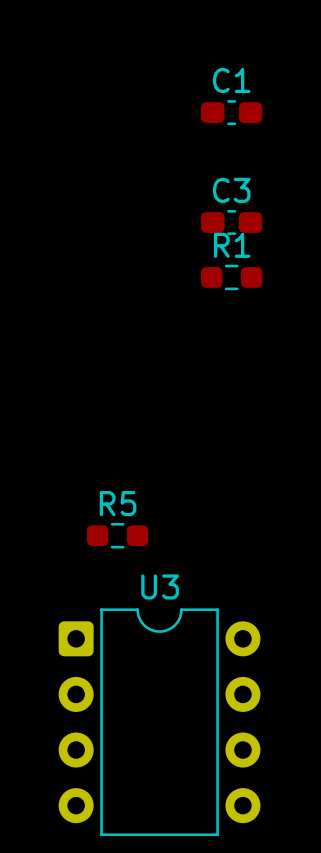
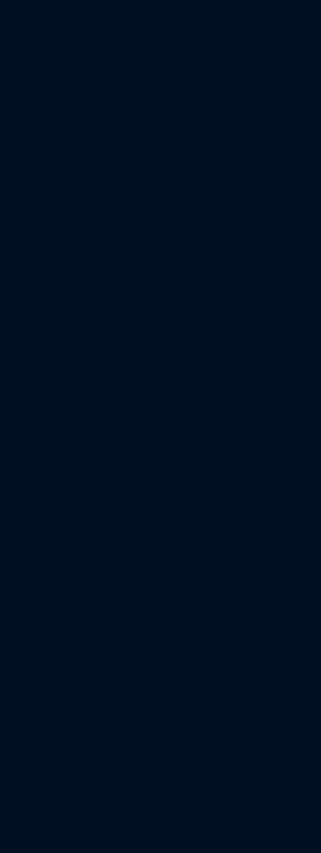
C1: (231, 112) -> none
C3: (231, 222) -> none
R1: (231, 277) -> none
R5: (117, 535) -> none
U3: (159, 722) -> none

